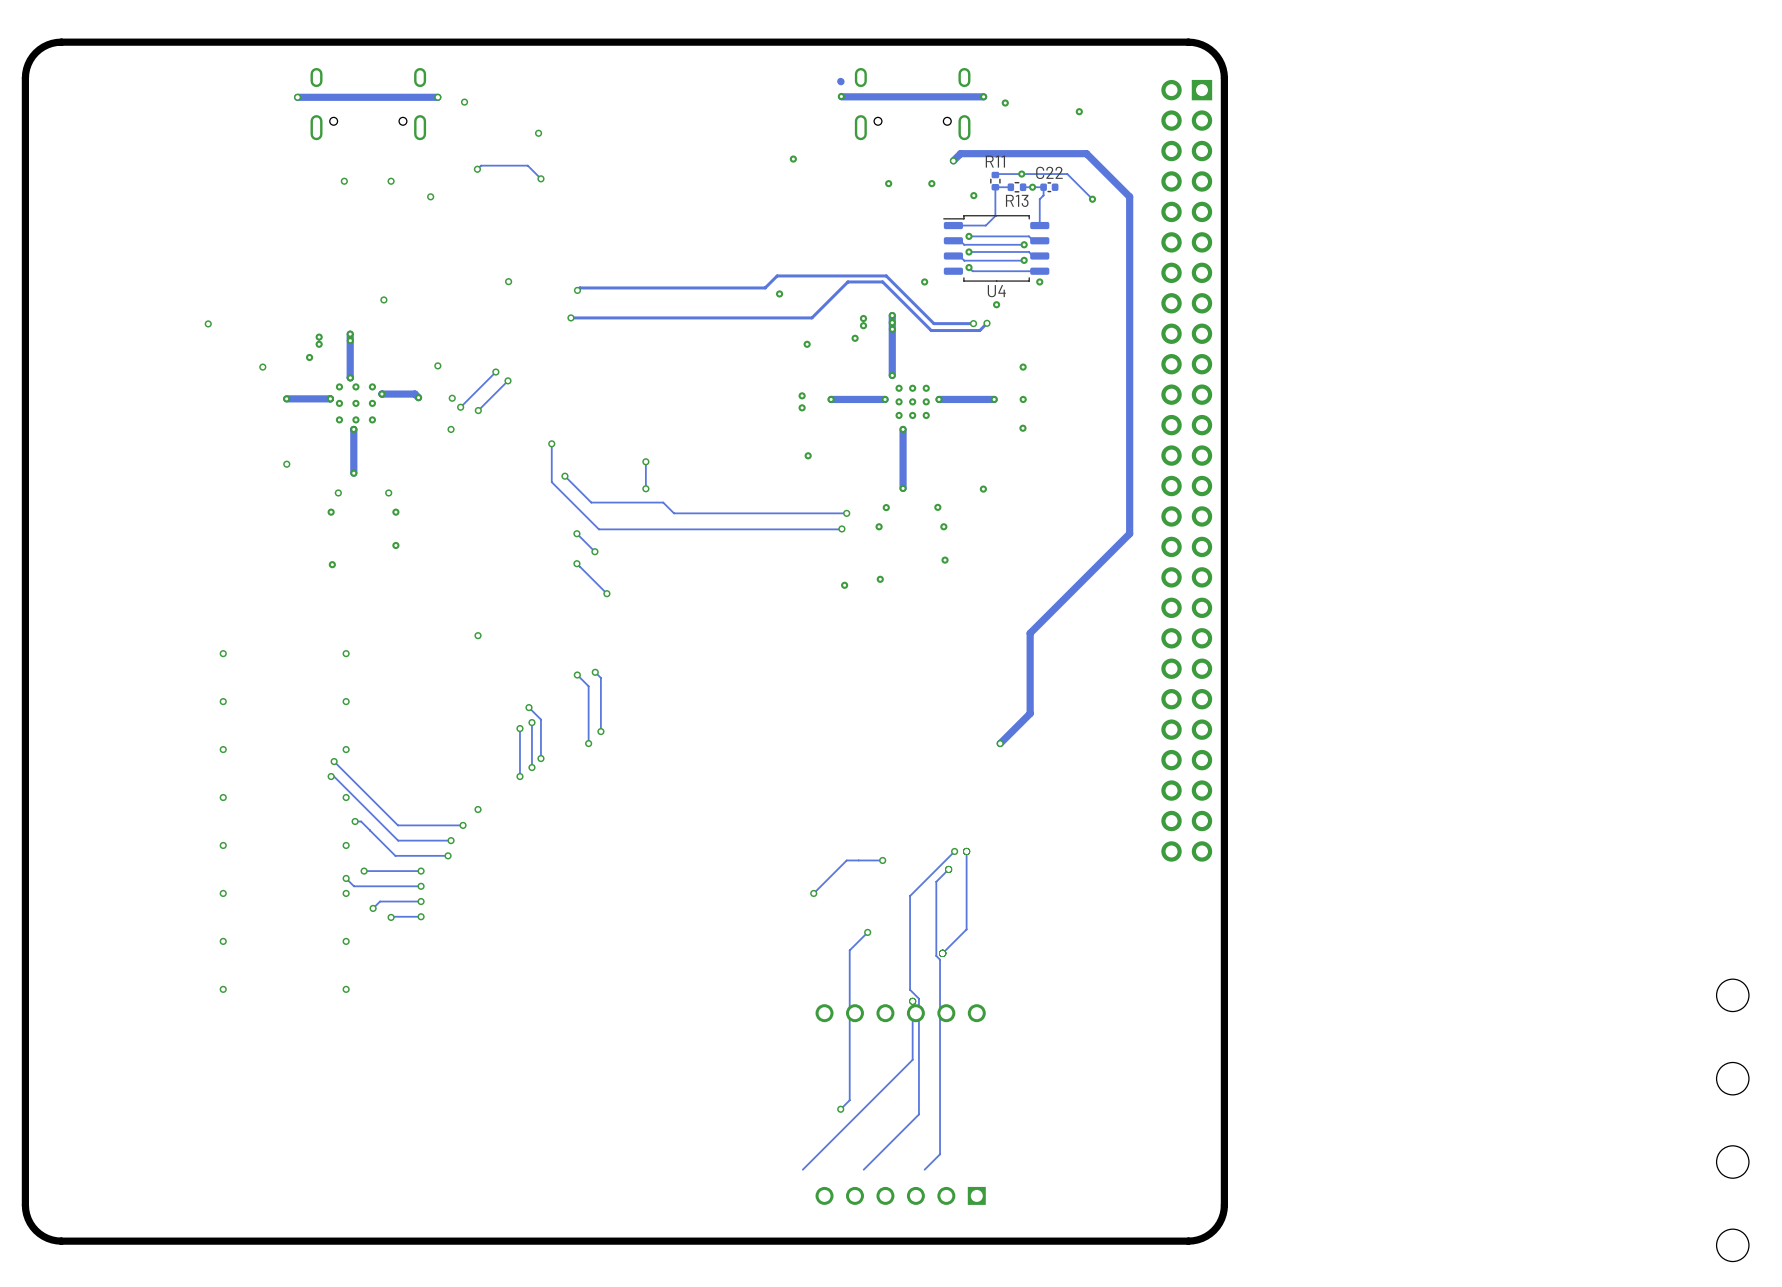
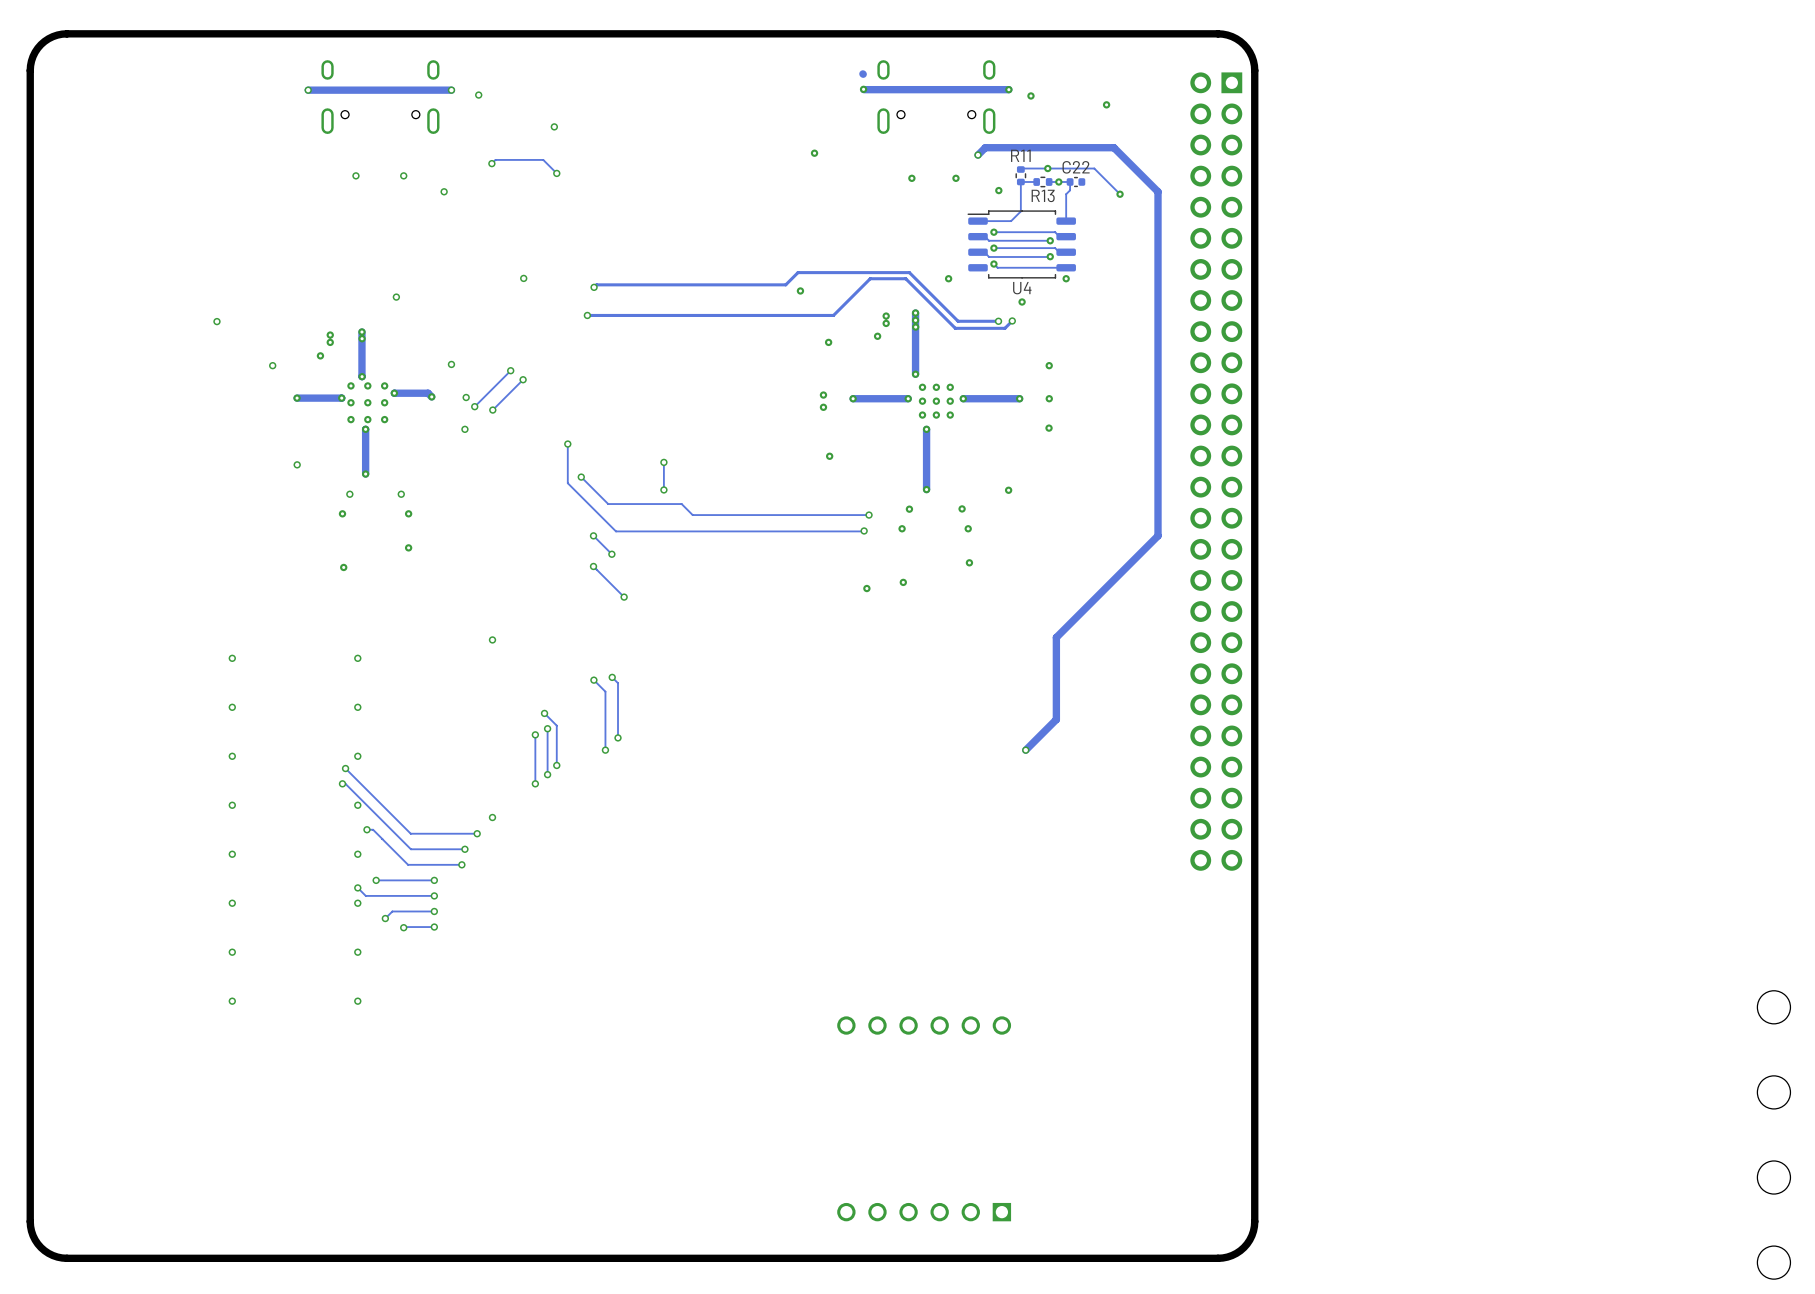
track: (954, 851) (910, 896) (910, 989) (918, 998) (918, 1114) (863, 1169) -> none
via: (954, 851) -> none
track: (966, 851) (966, 929) (942, 953) -> none
via: (966, 851) -> none
track: (882, 860) (846, 860) (813, 893) -> none
via: (882, 860) -> none
track: (948, 869) (936, 881) (936, 956) (940, 959) (940, 1154) (924, 1169) -> none
via: (948, 869) -> none
via: (813, 893) -> none
track: (867, 932) (849, 950) (849, 1100) (840, 1109) -> none
via: (867, 932) -> none
via: (942, 953) -> none
track: (912, 1001) (912, 1059) (802, 1169) -> none
via: (912, 1001) -> none
via: (840, 1109) -> none

